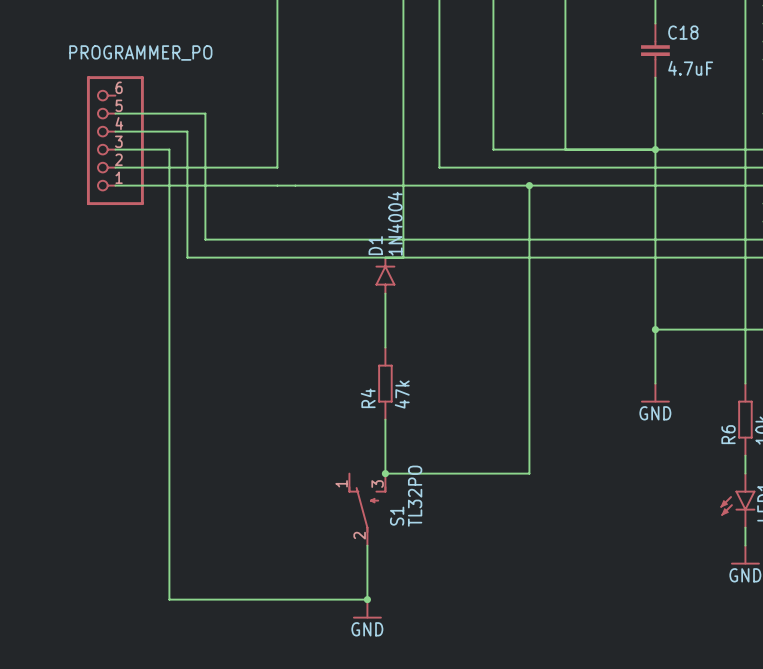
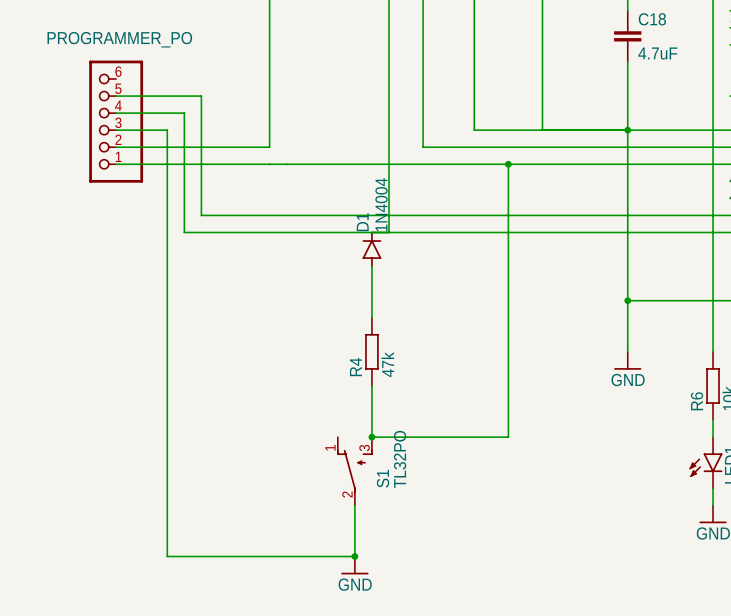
PROGRAMMER_PO name position: PROGRAMMER_PO (140, 53) -> PROGRAMMER_PO (119, 39)

